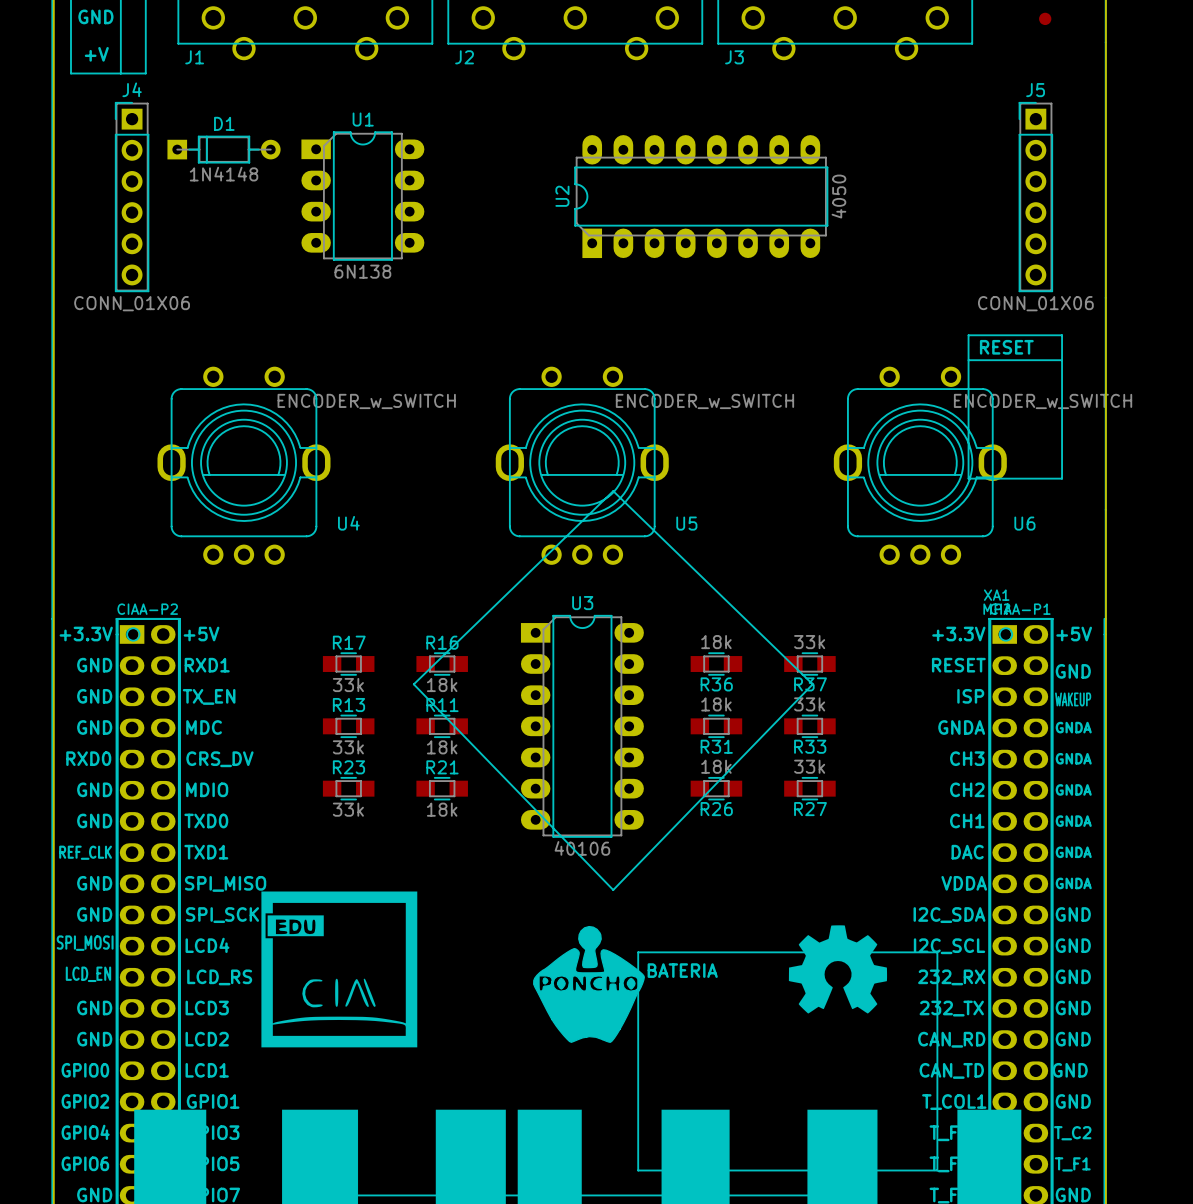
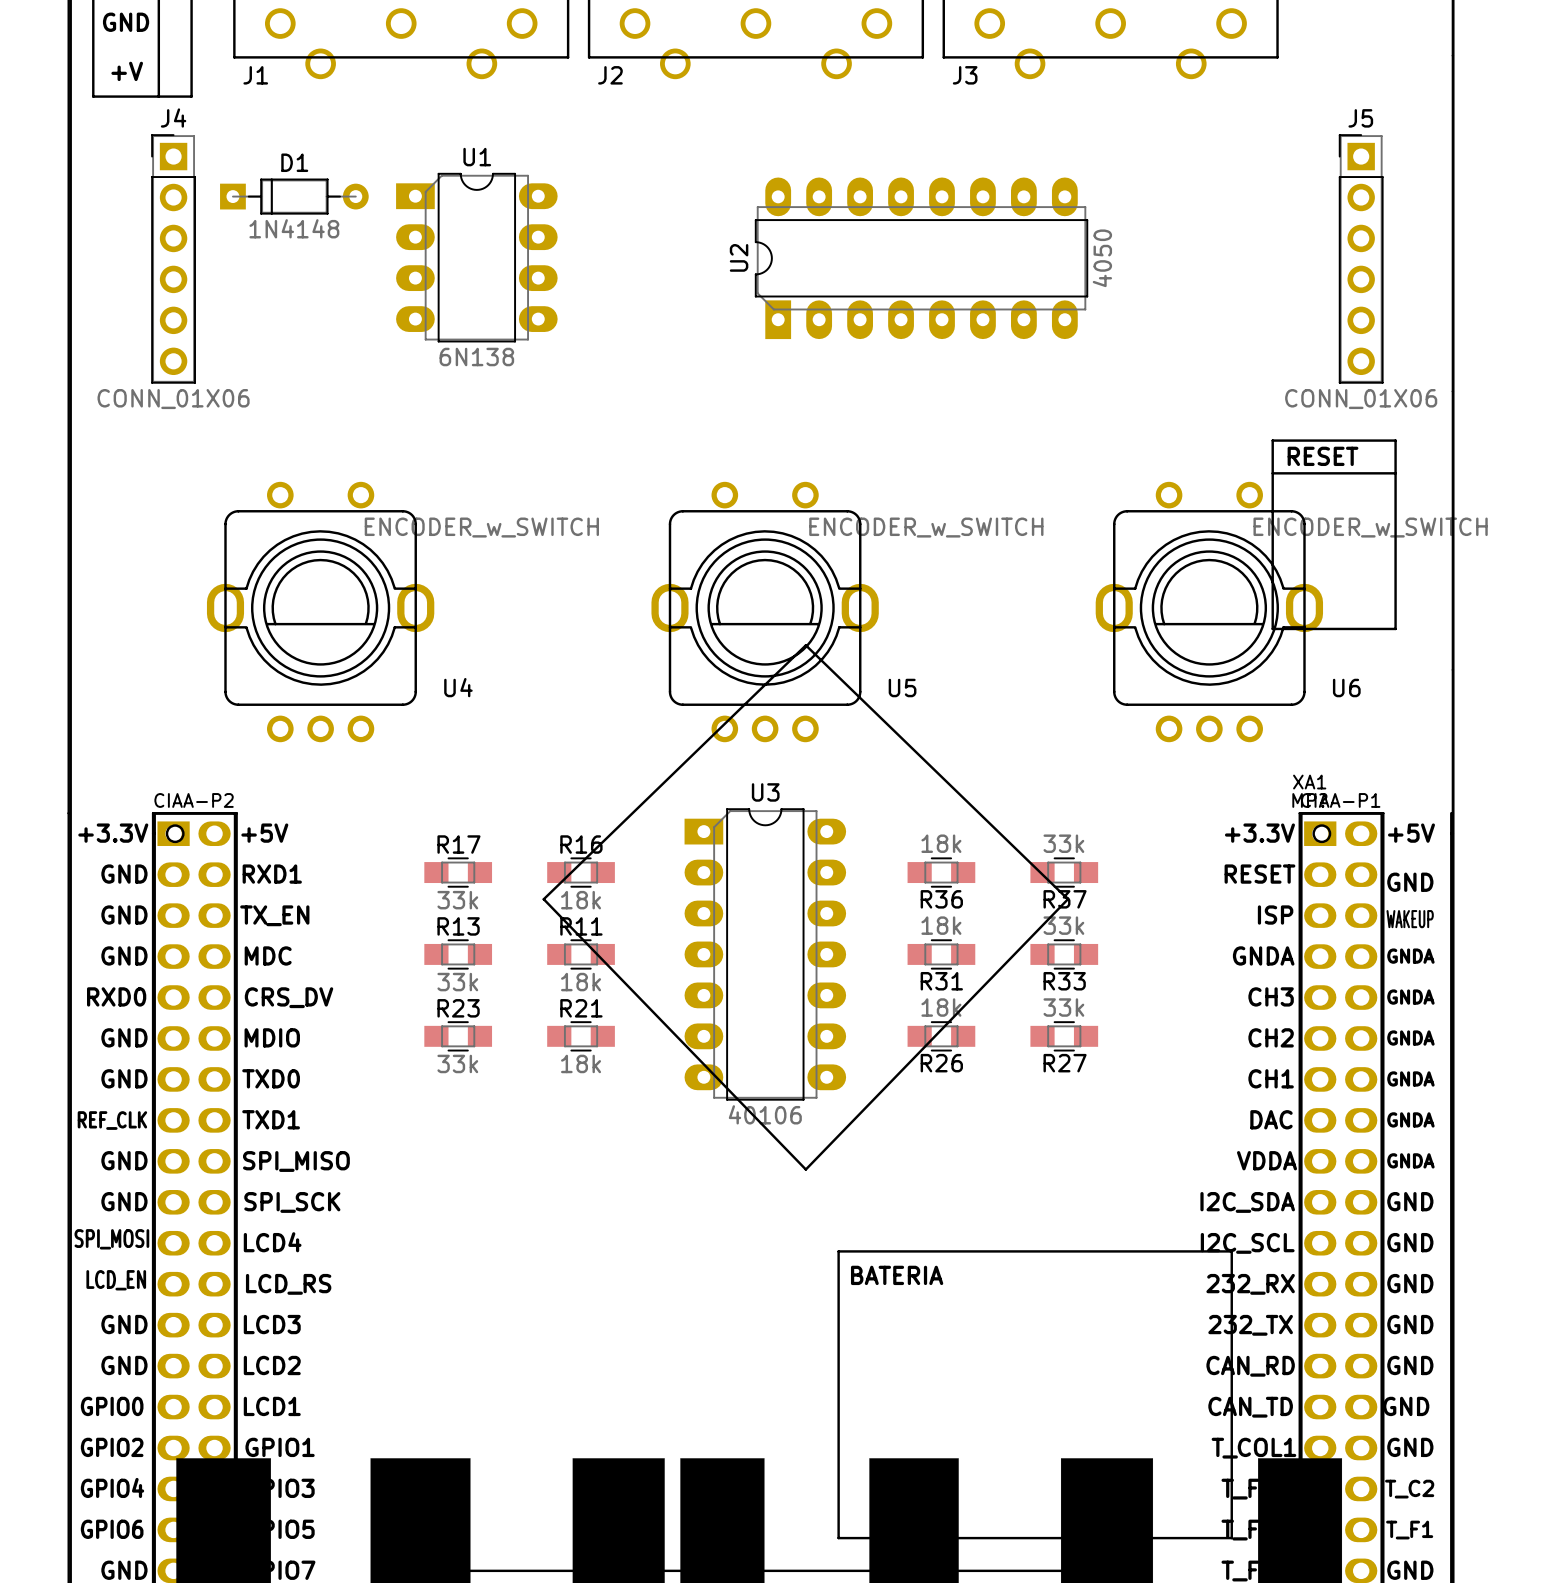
part: (1045, 18) -> none
drawing: [261, 891, 418, 1048] -> none
drawing: [533, 925, 645, 1043] -> none
drawing: [788, 925, 888, 1014] -> none

